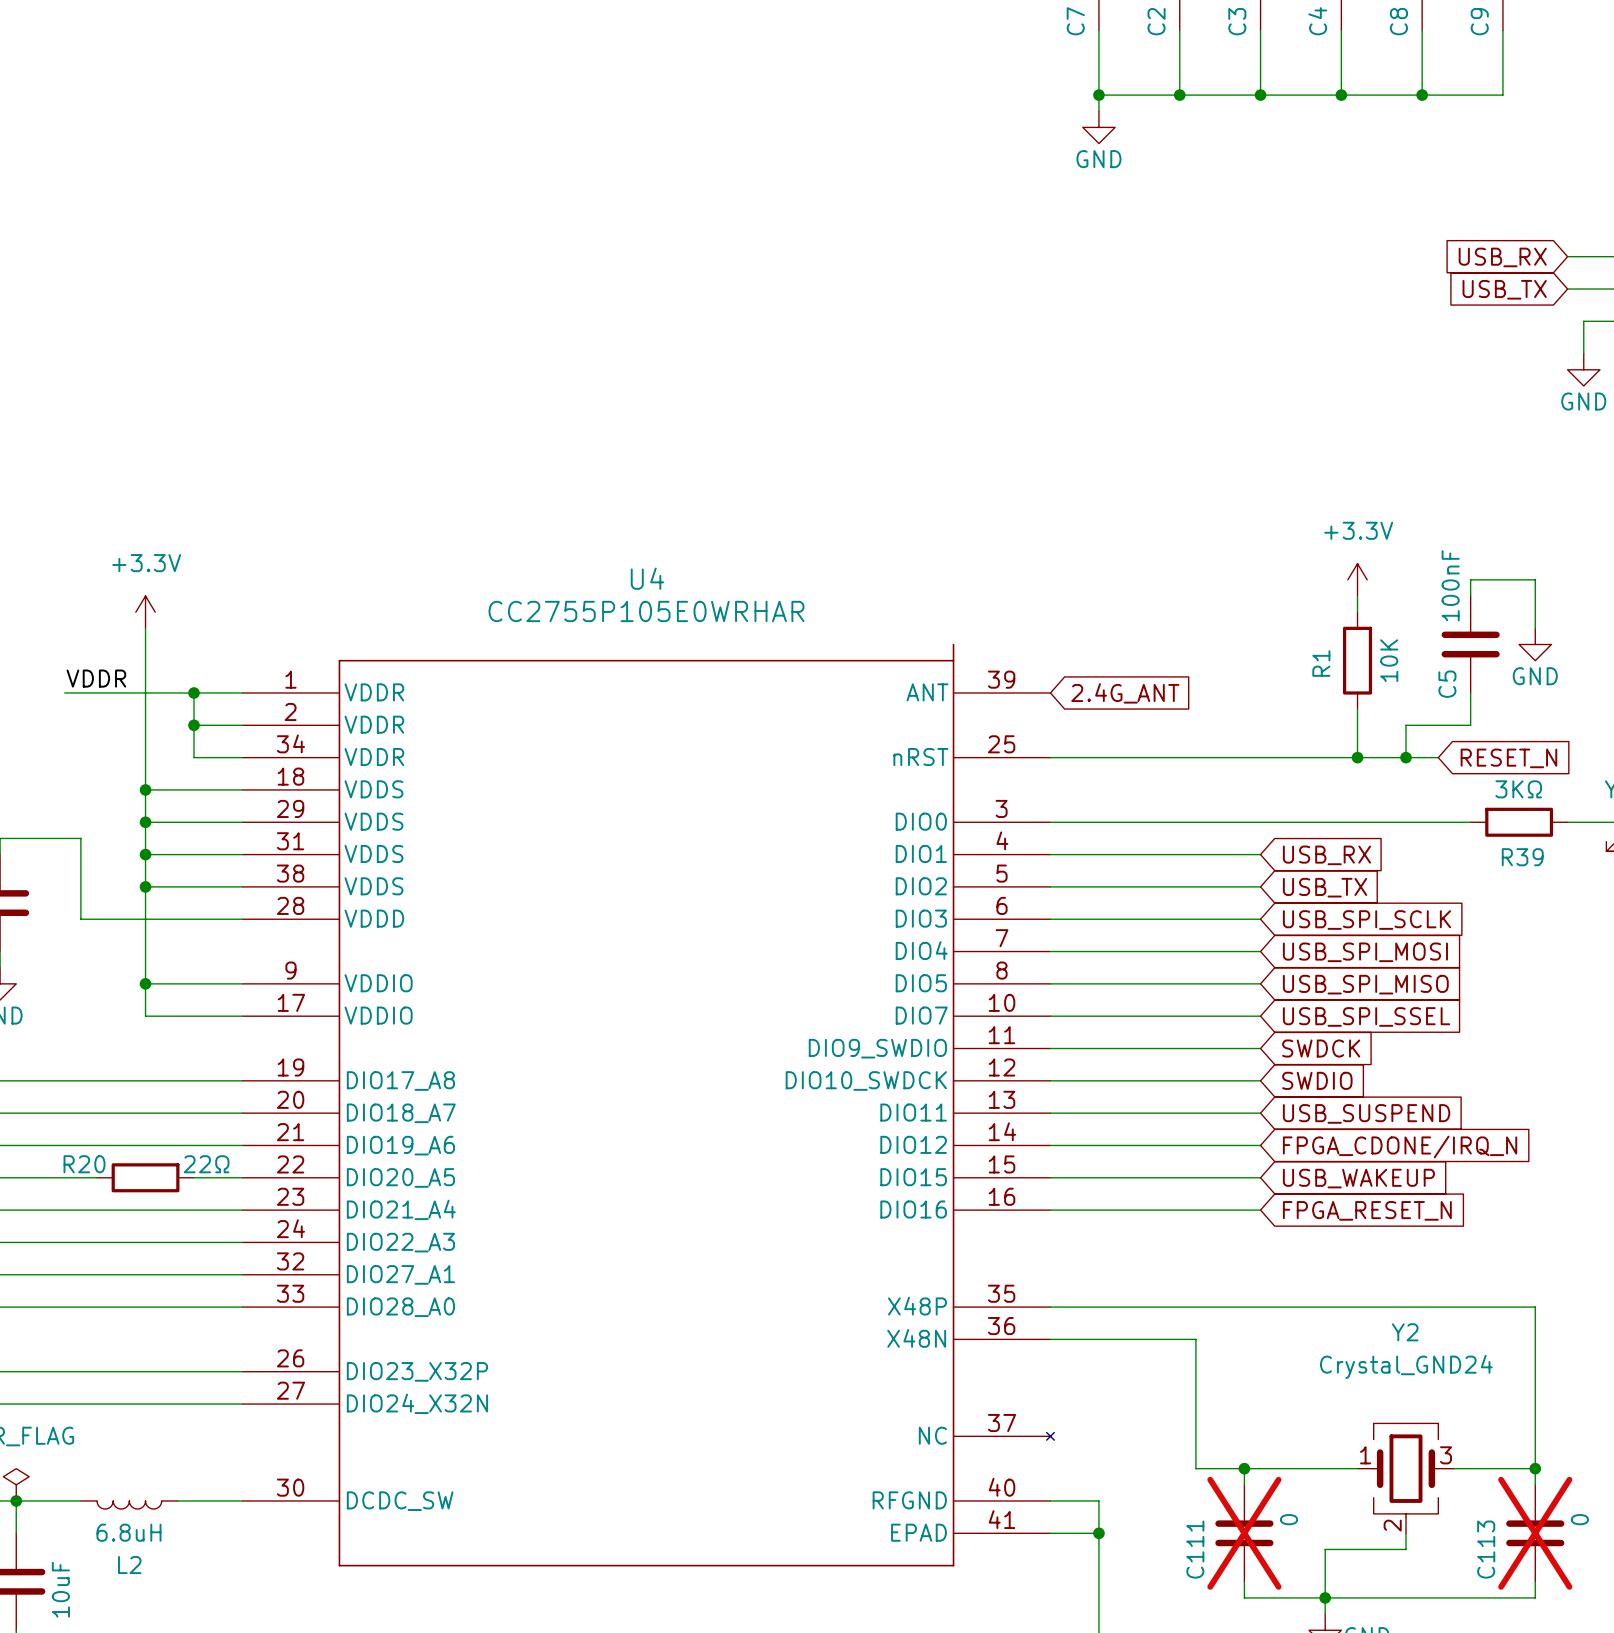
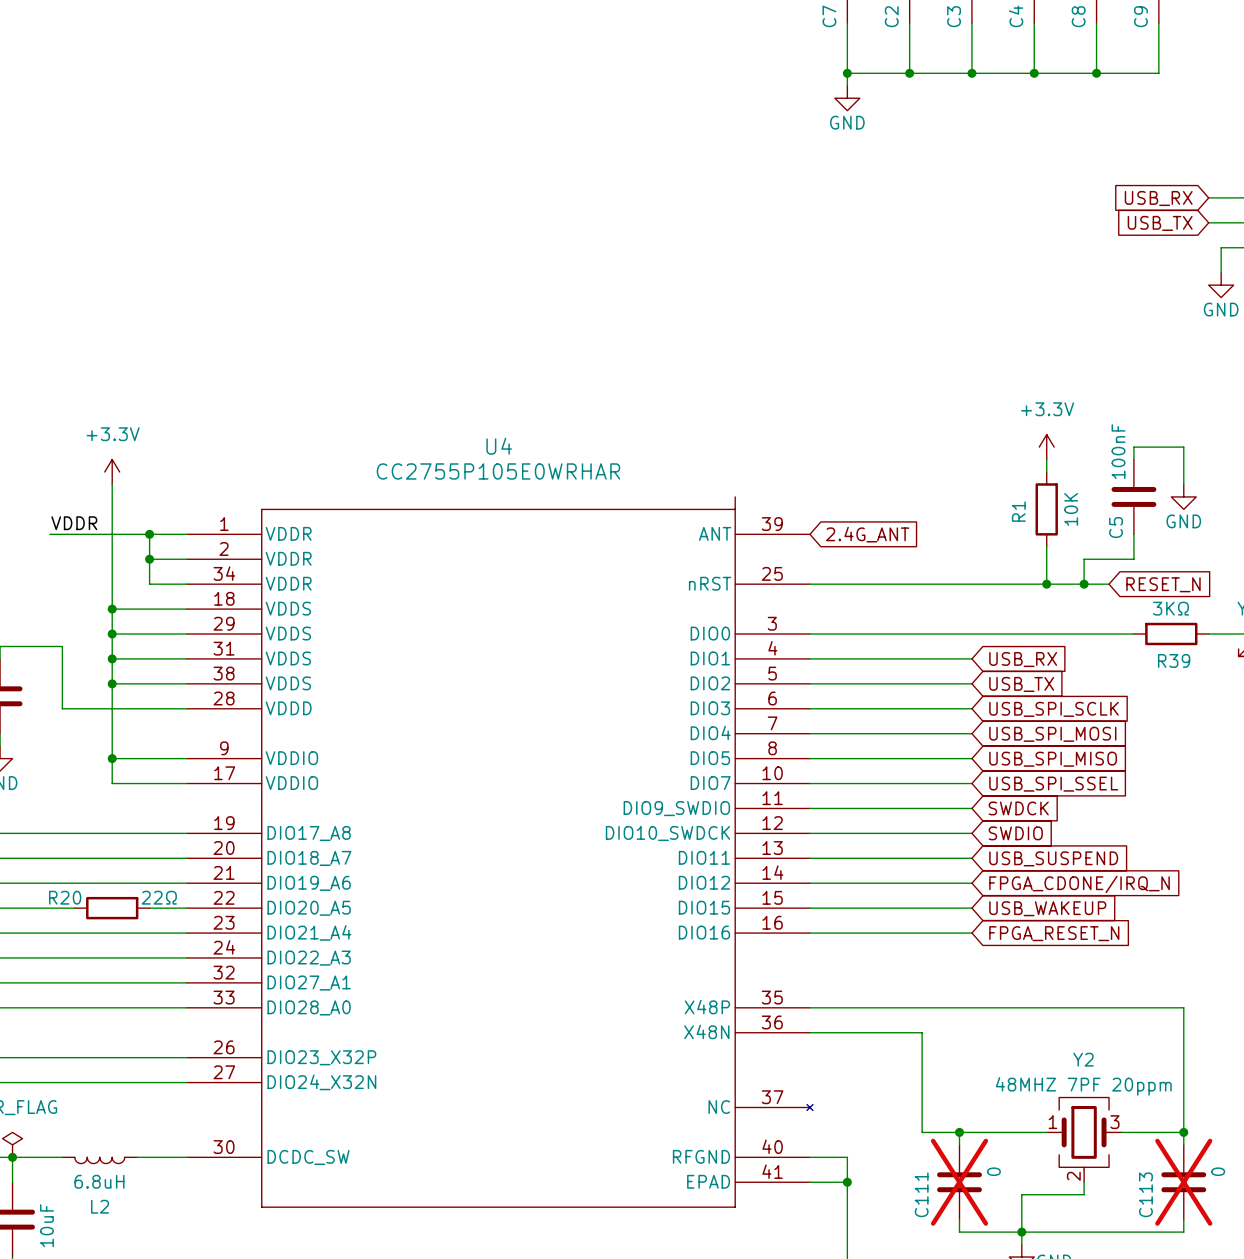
Y2 name position: Y2 (1405, 1332) -> Y2 (1083, 1059)
Y2 value: Crystal_GND24 (1406, 1366) -> 48MHZ 7PF 20ppm (1083, 1086)

